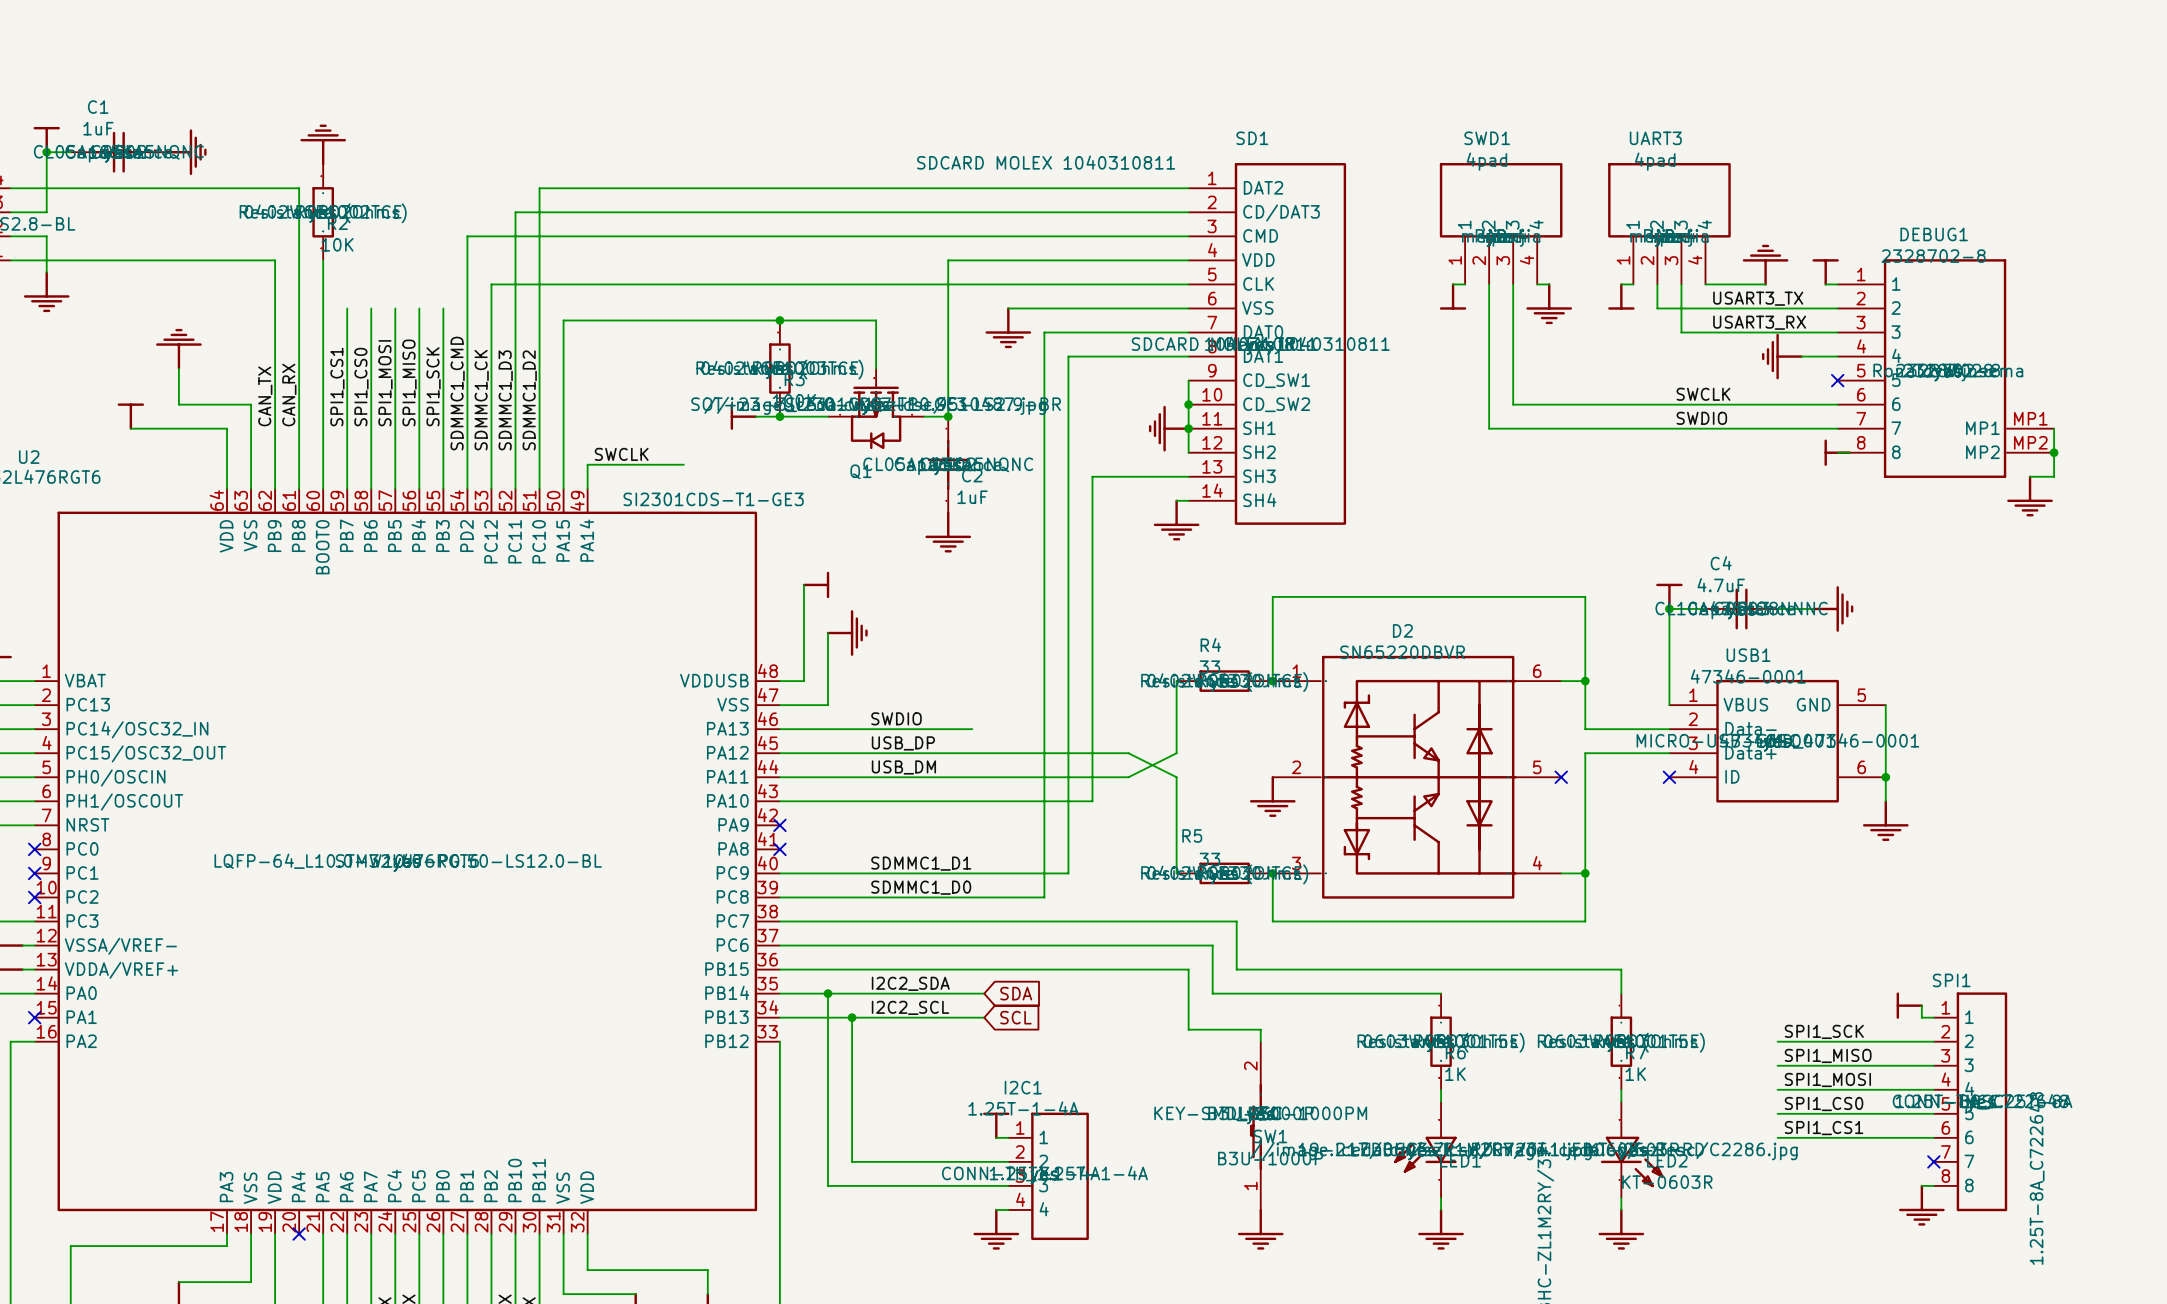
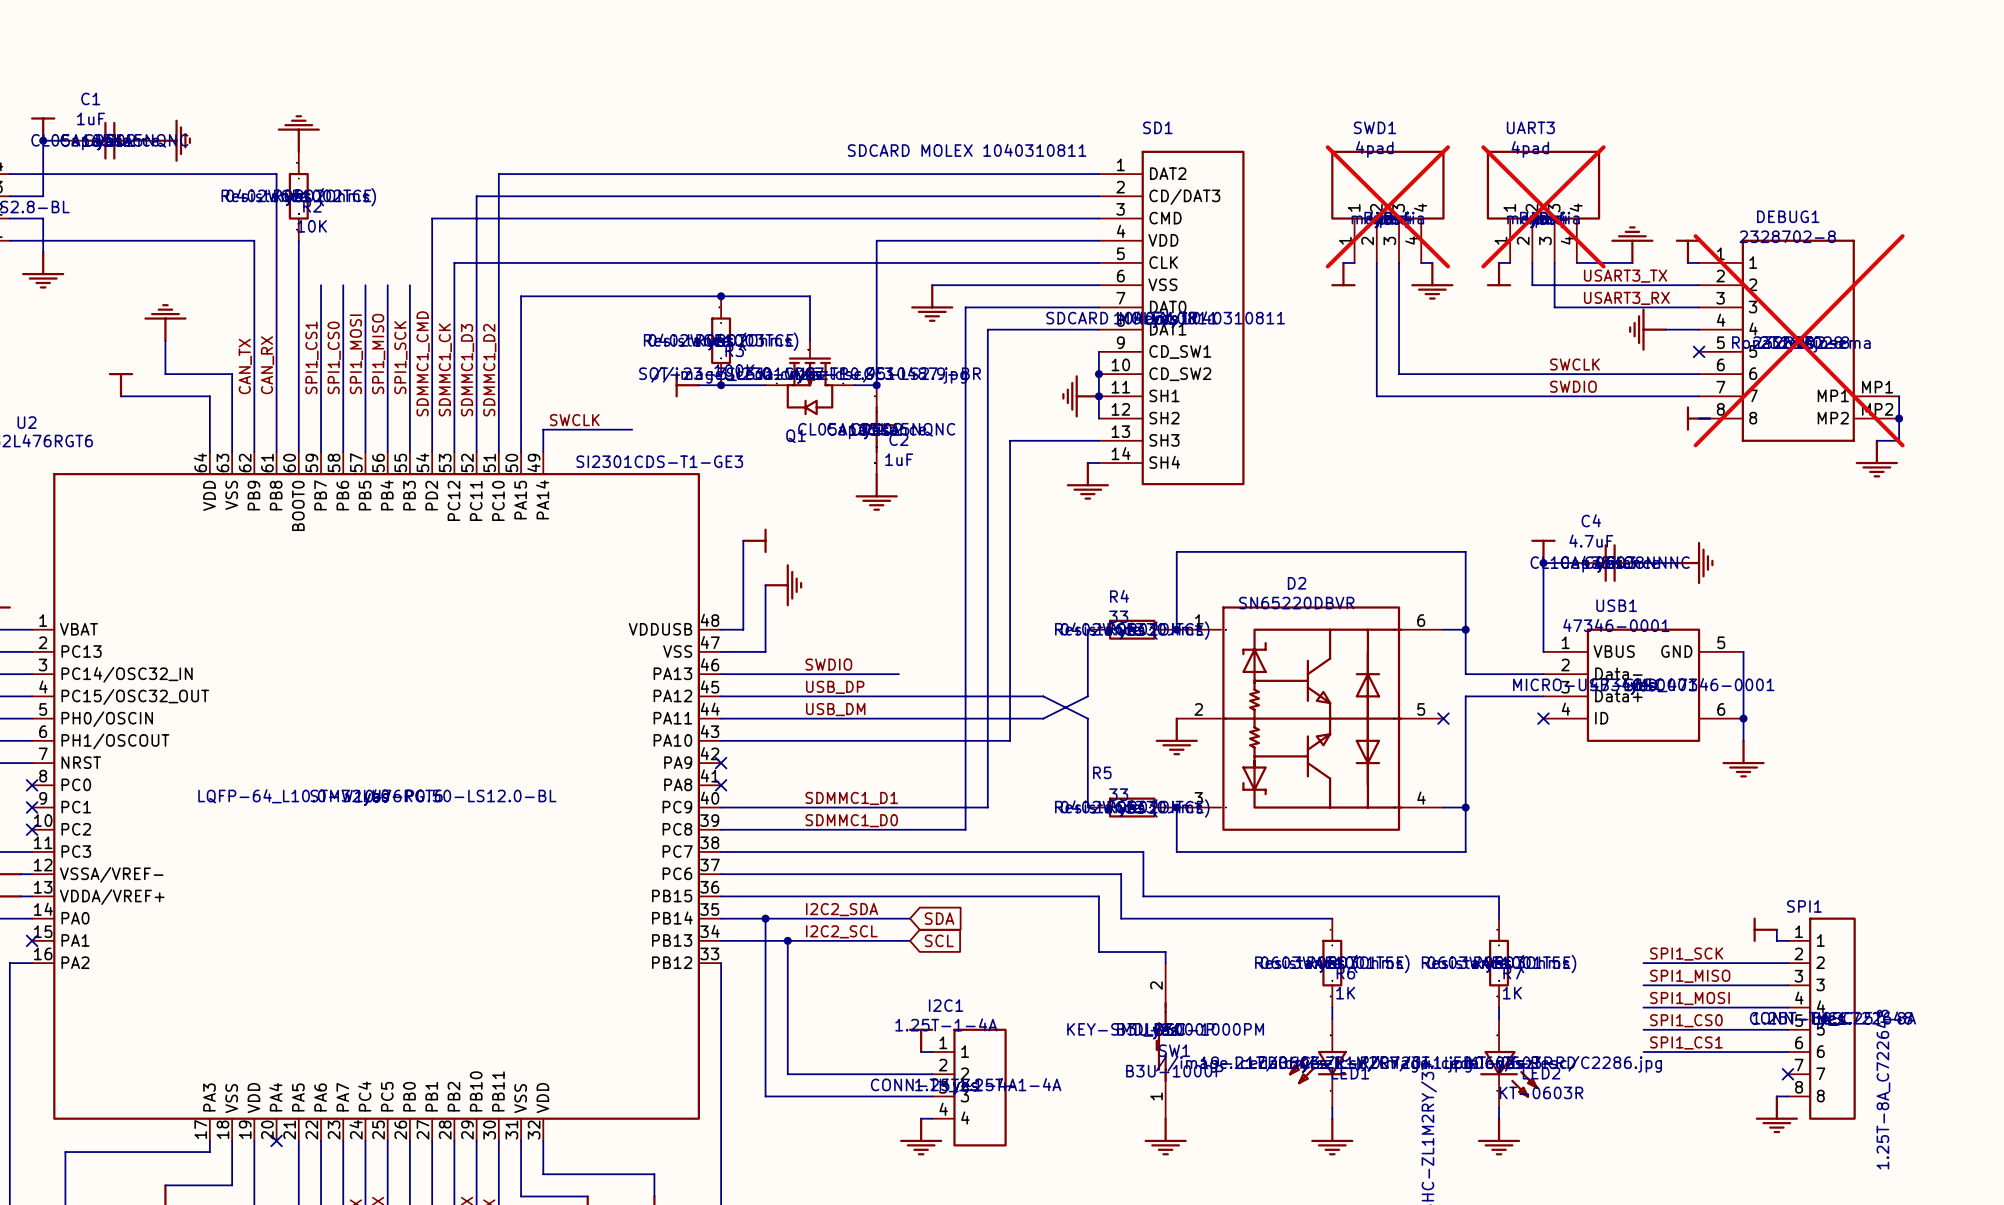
SWD1 do-not-place cross: none -> (1387, 206)
UART3 do-not-place cross: none -> (1543, 206)
DEBUG1 do-not-place cross: none -> (1799, 340)

